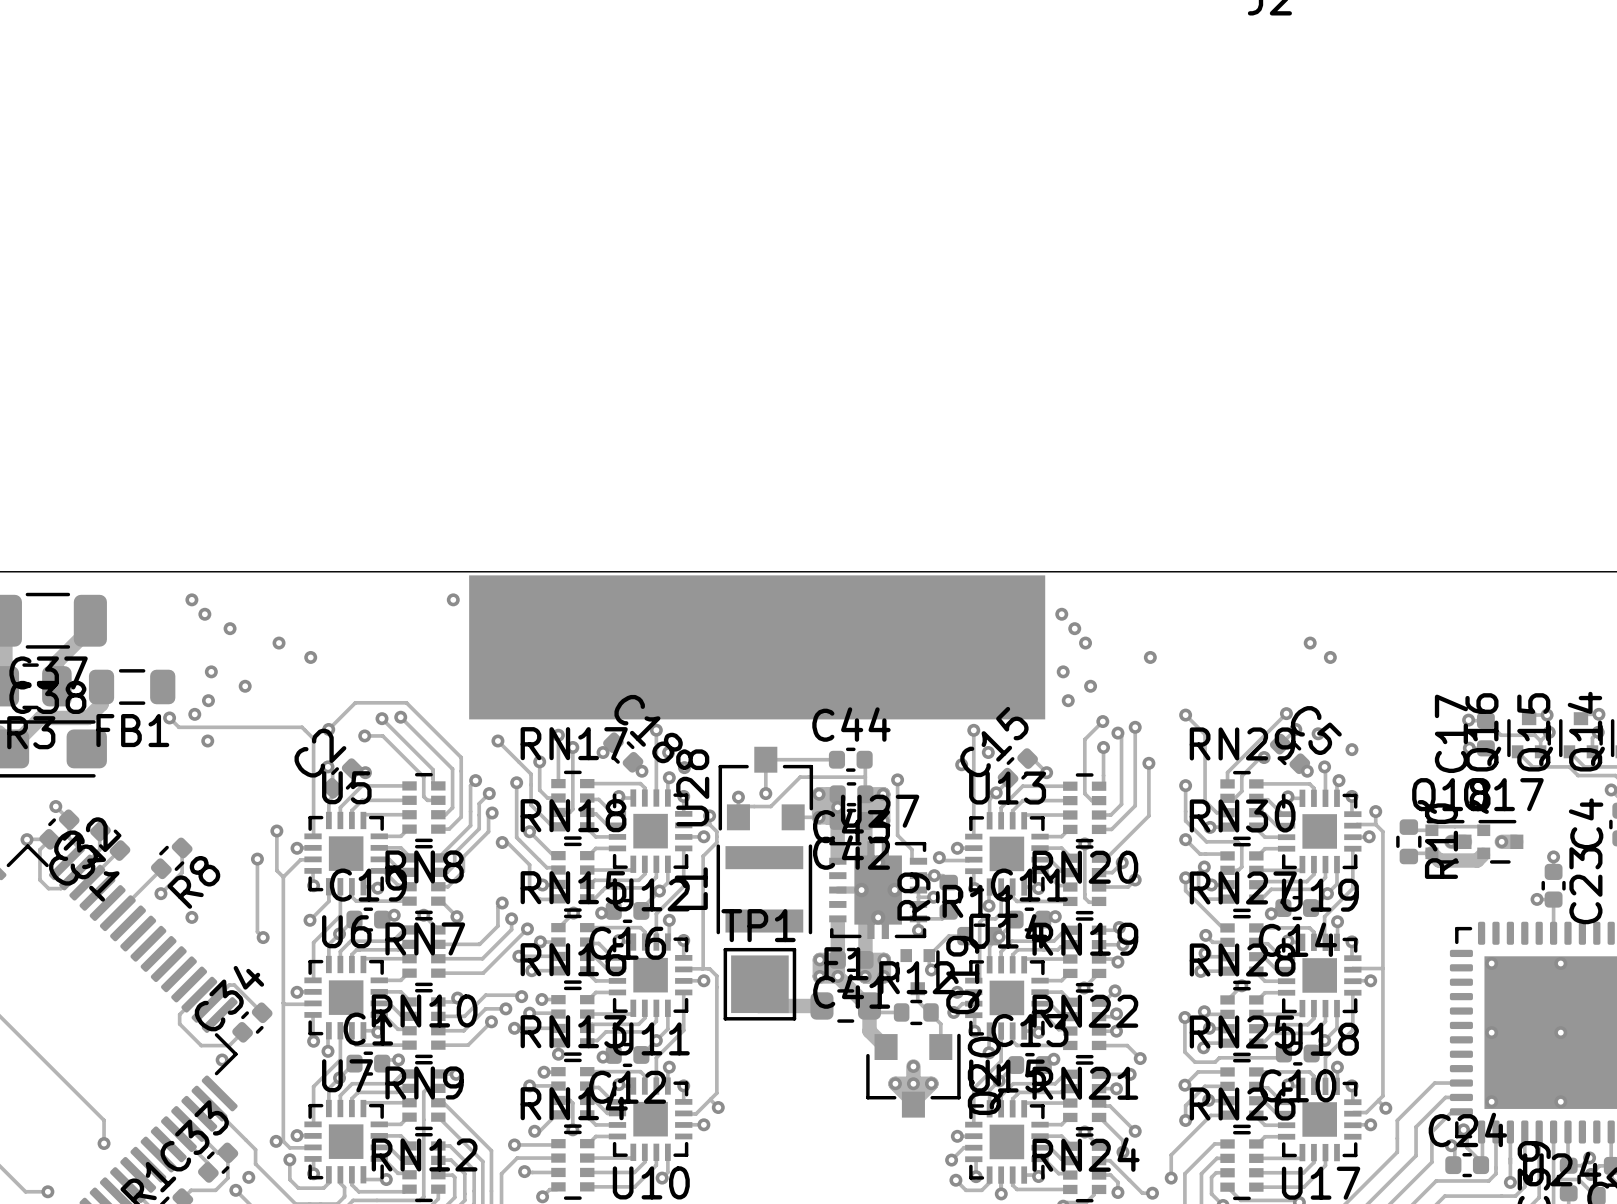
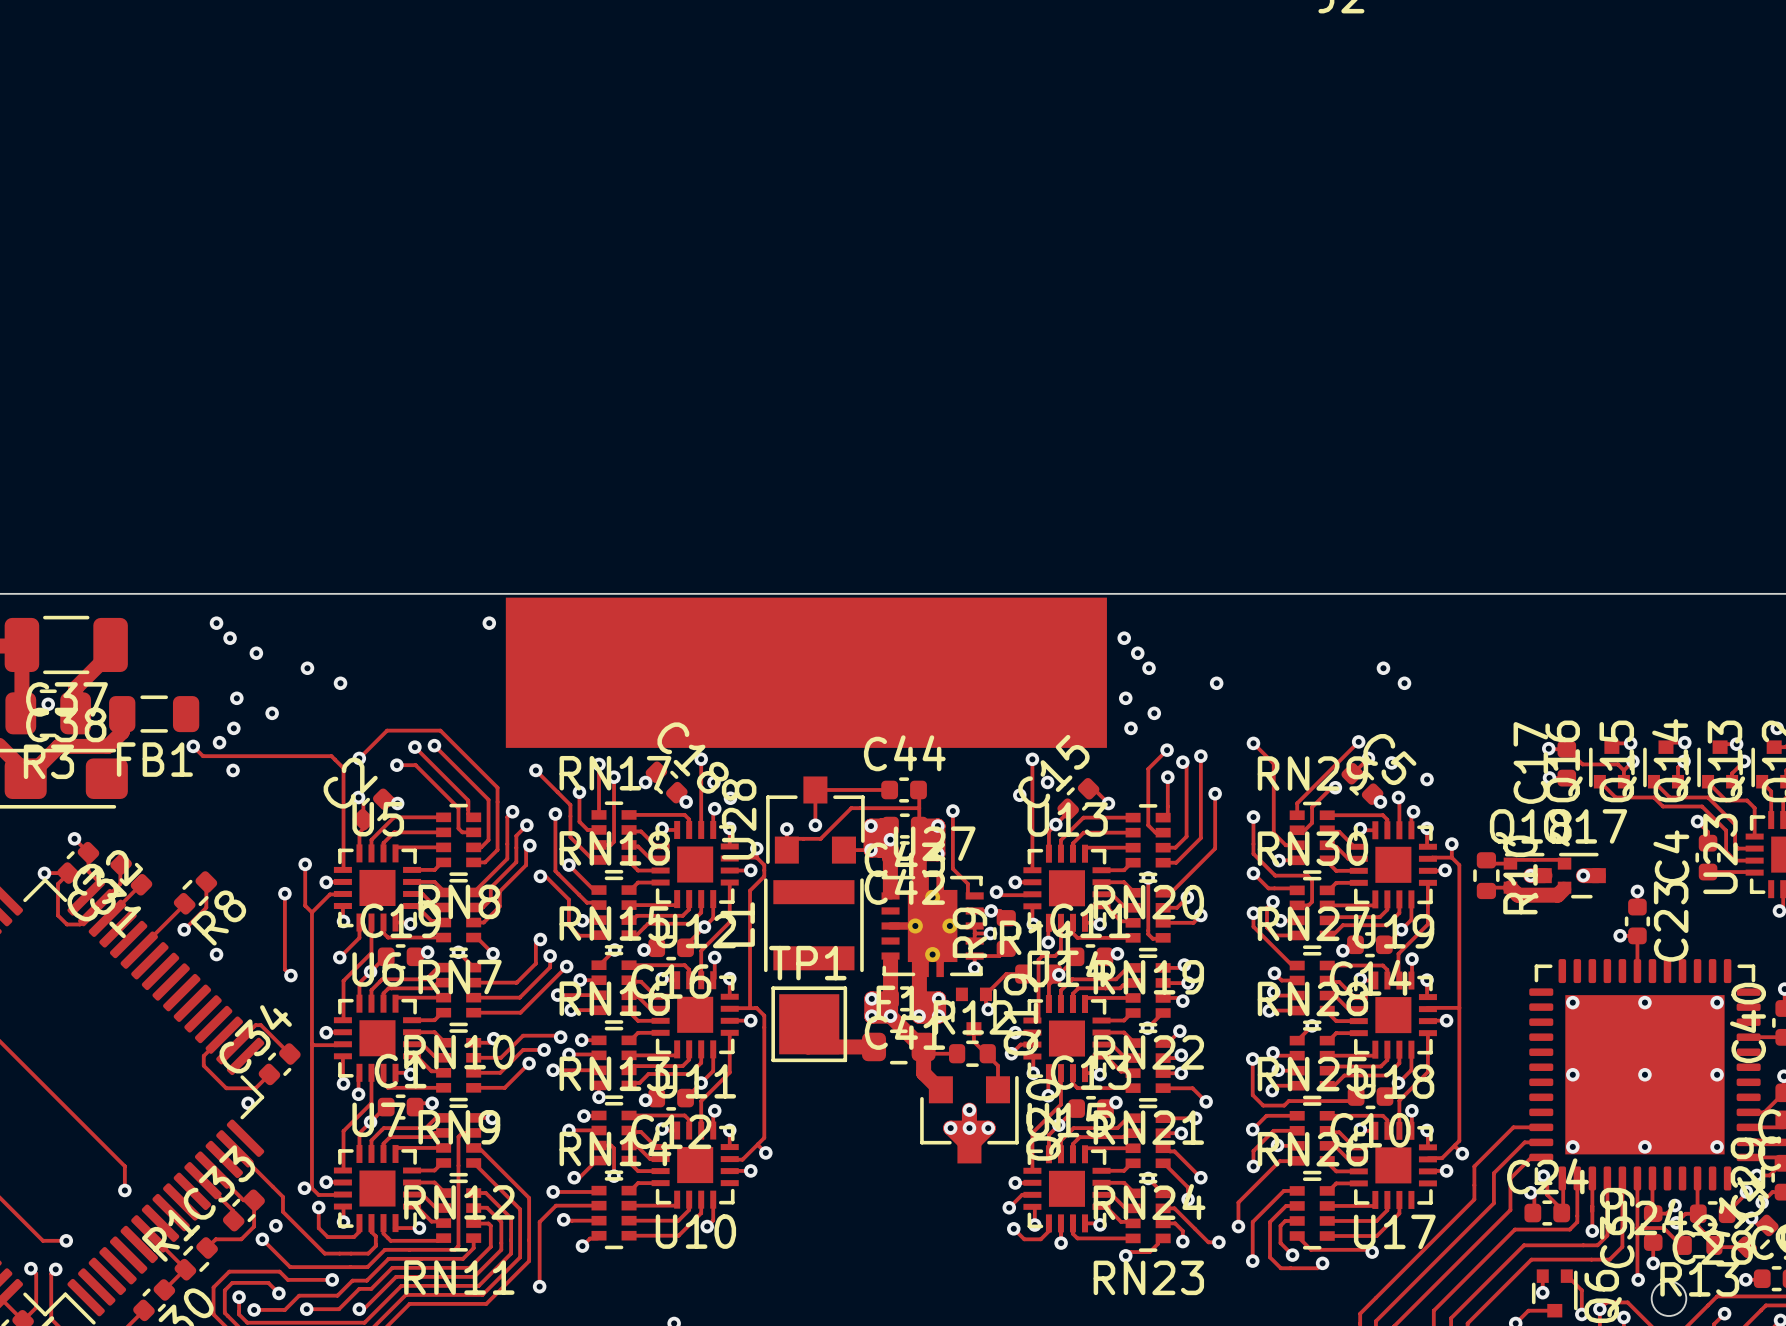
via: none -> (48, 704)

